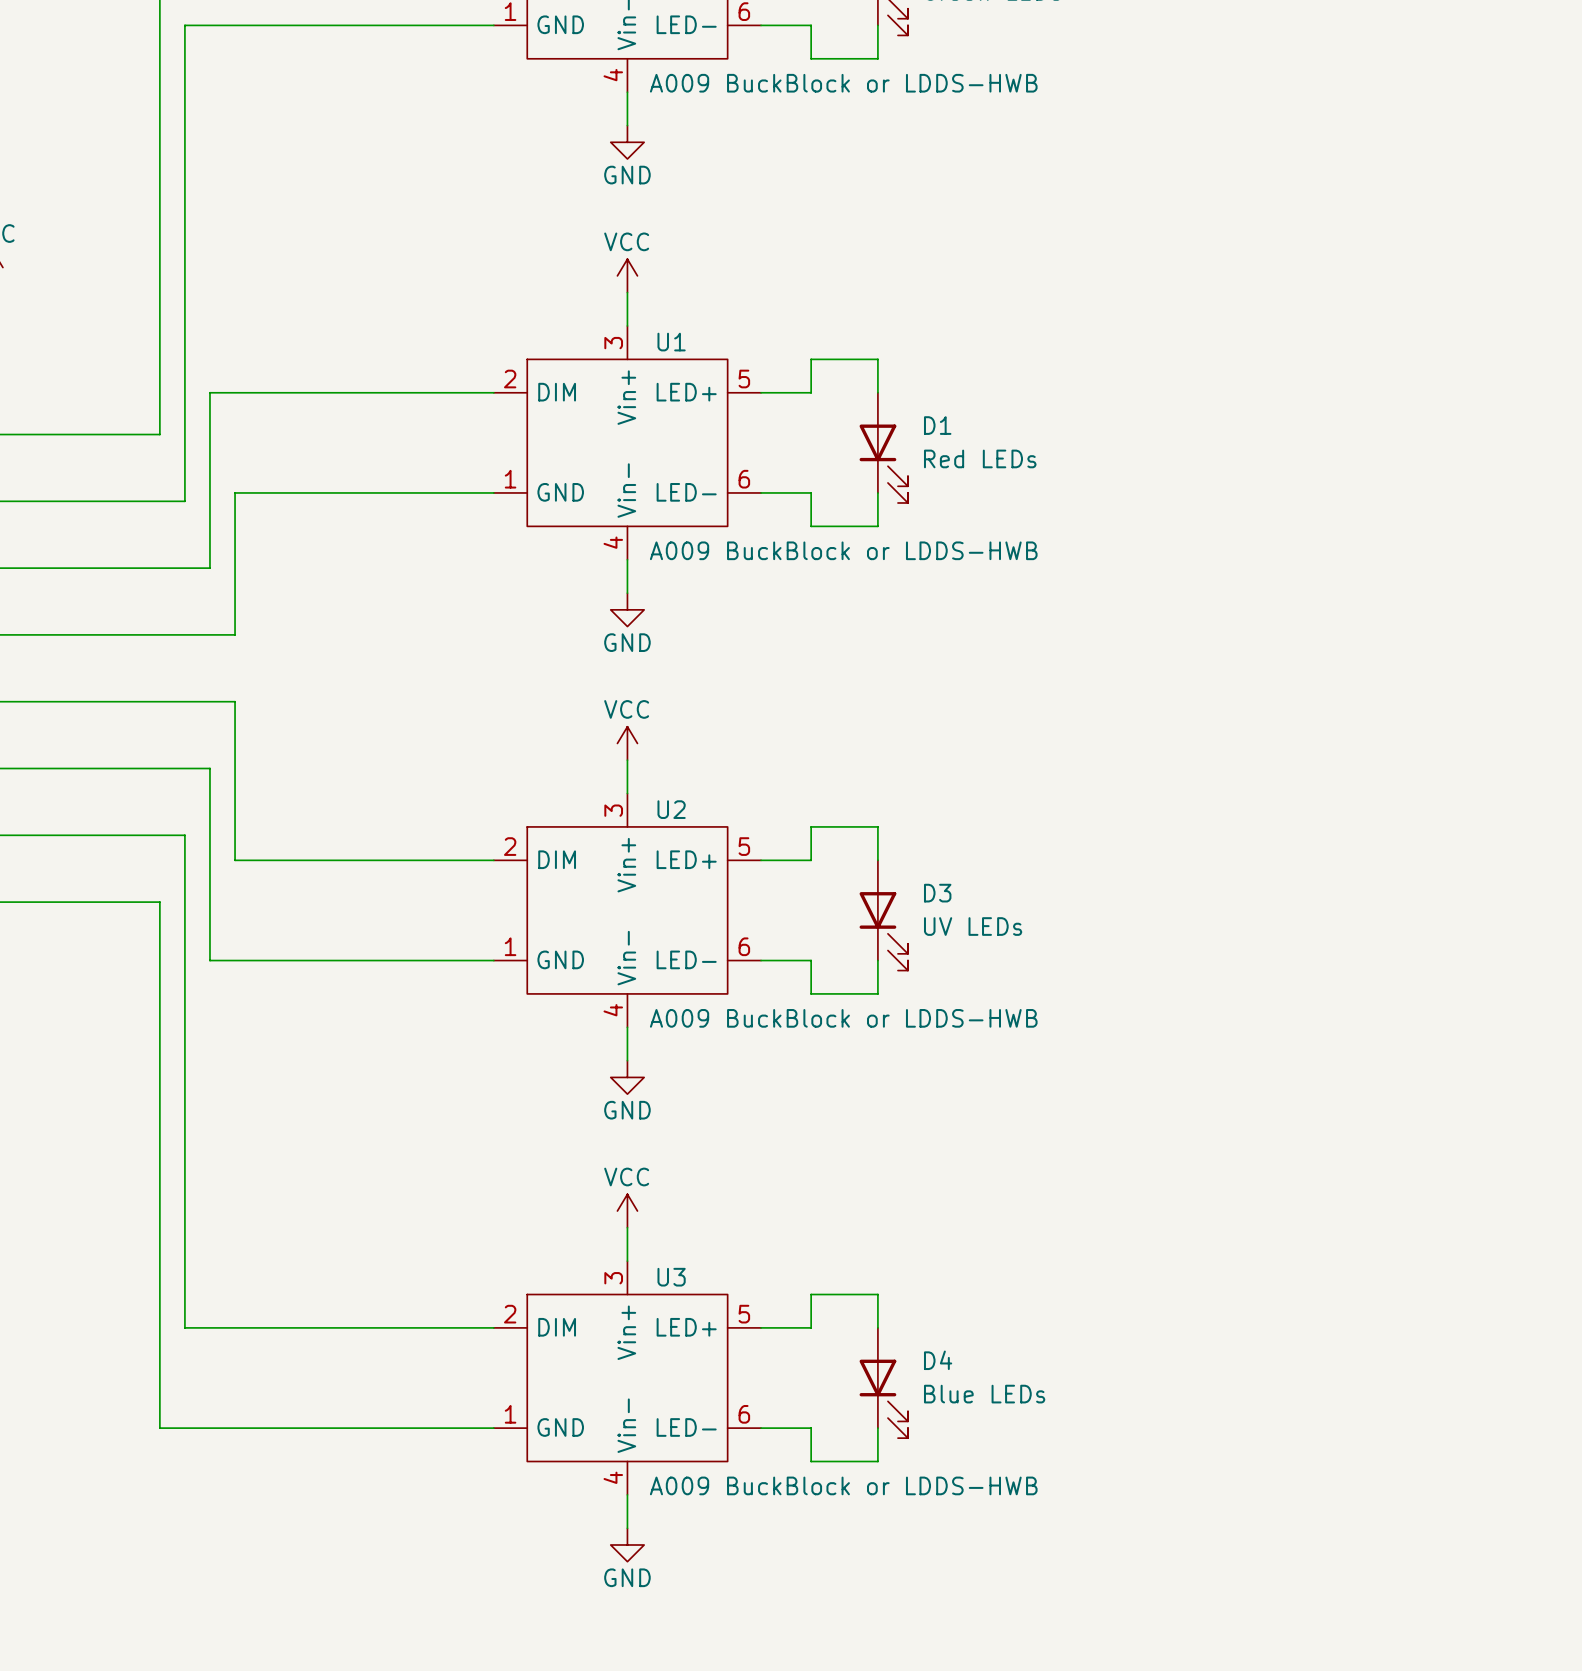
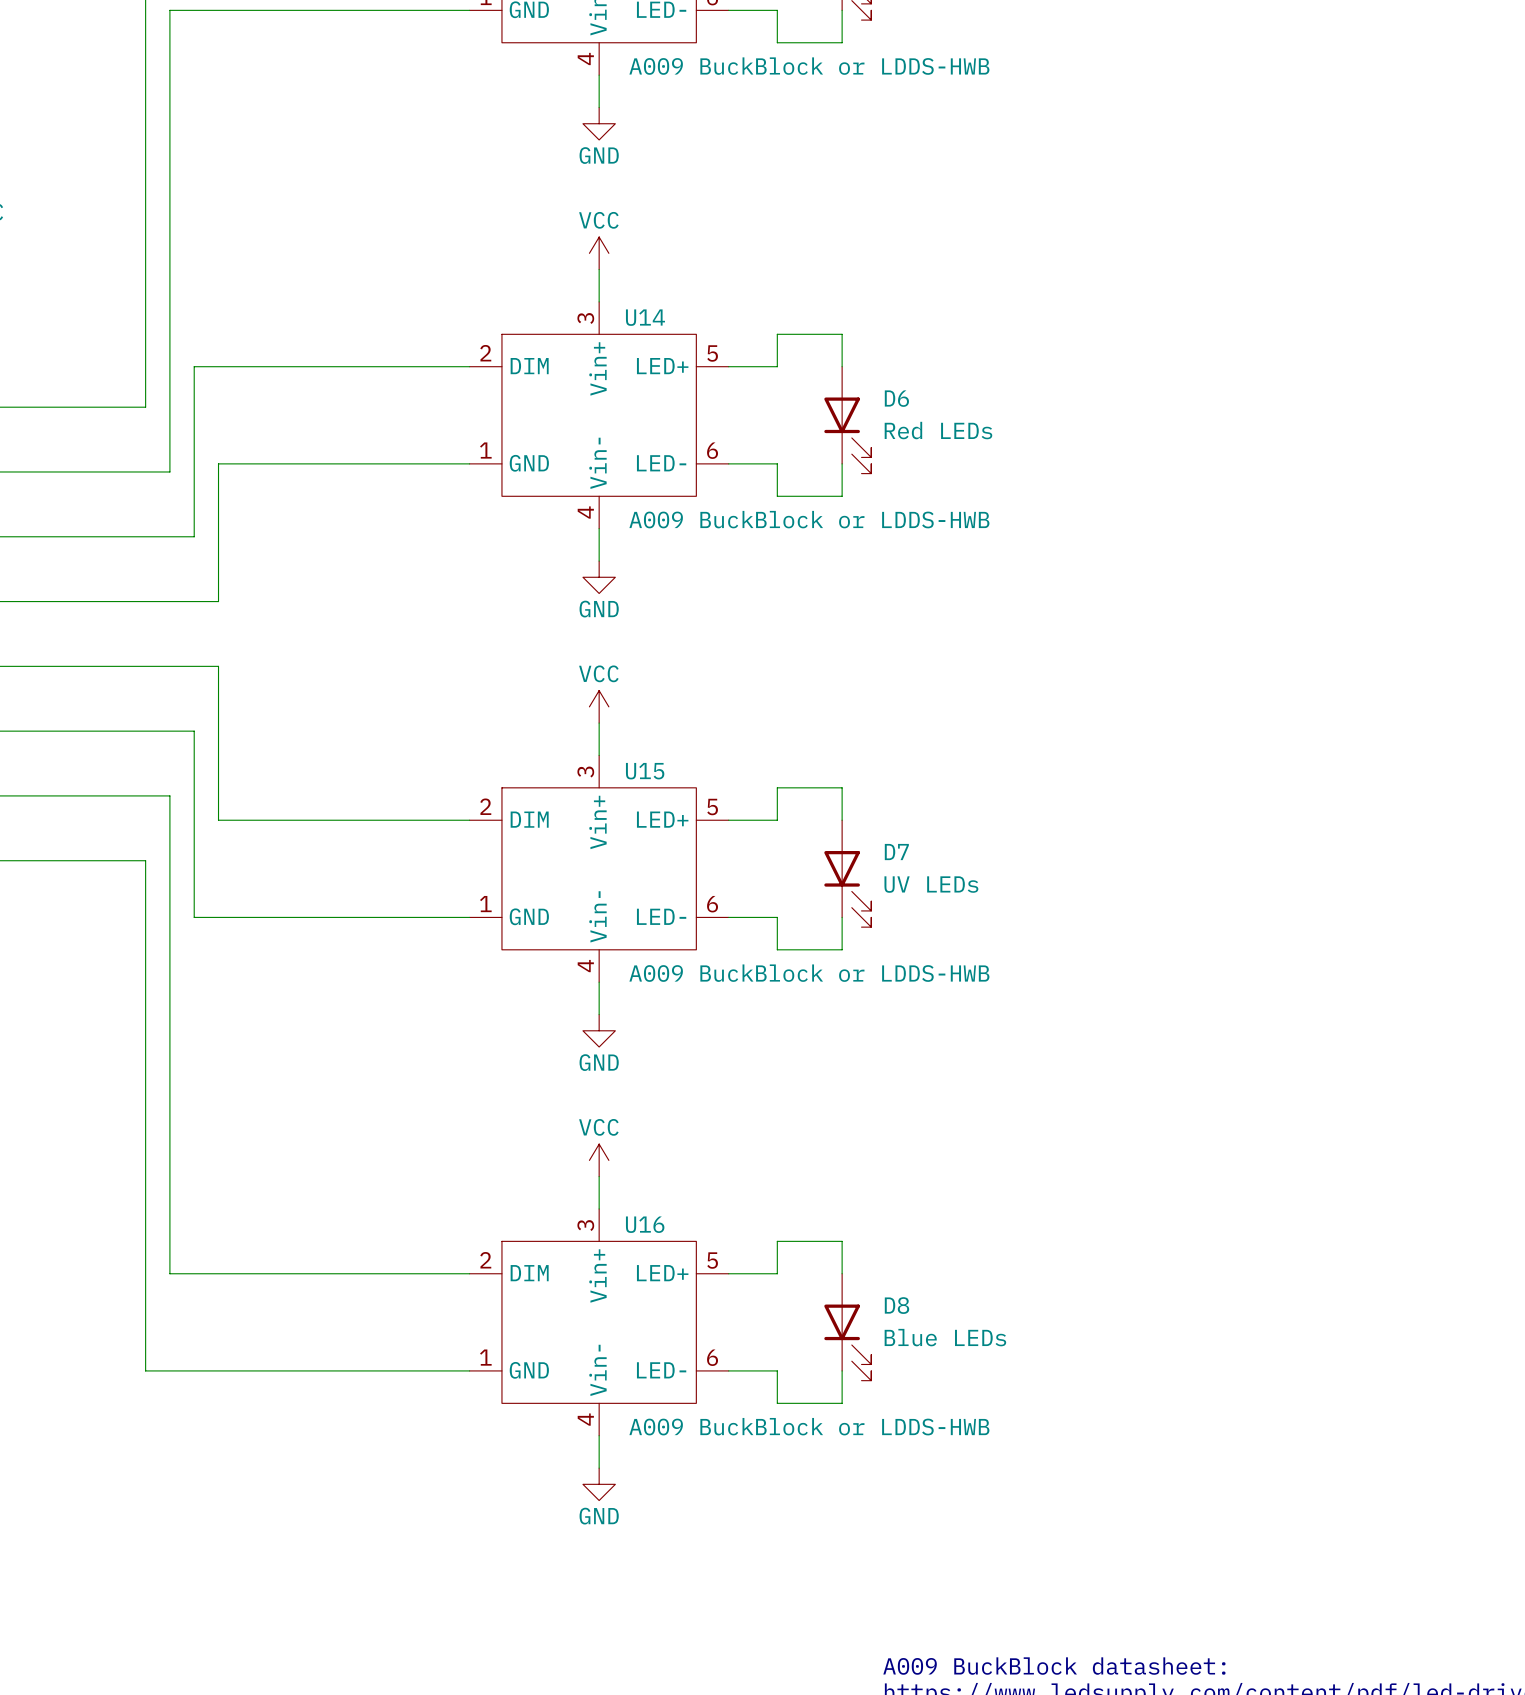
U1 name: U1 (671, 342) -> U14 (645, 317)
D1 name: D1 (937, 425) -> D6 (896, 398)
U2 name: U2 (671, 809) -> U15 (645, 771)
D3 name: D3 (937, 893) -> D7 (896, 852)
U3 name: U3 (671, 1277) -> U16 (645, 1224)
D4 name: D4 (938, 1360) -> D8 (896, 1305)

